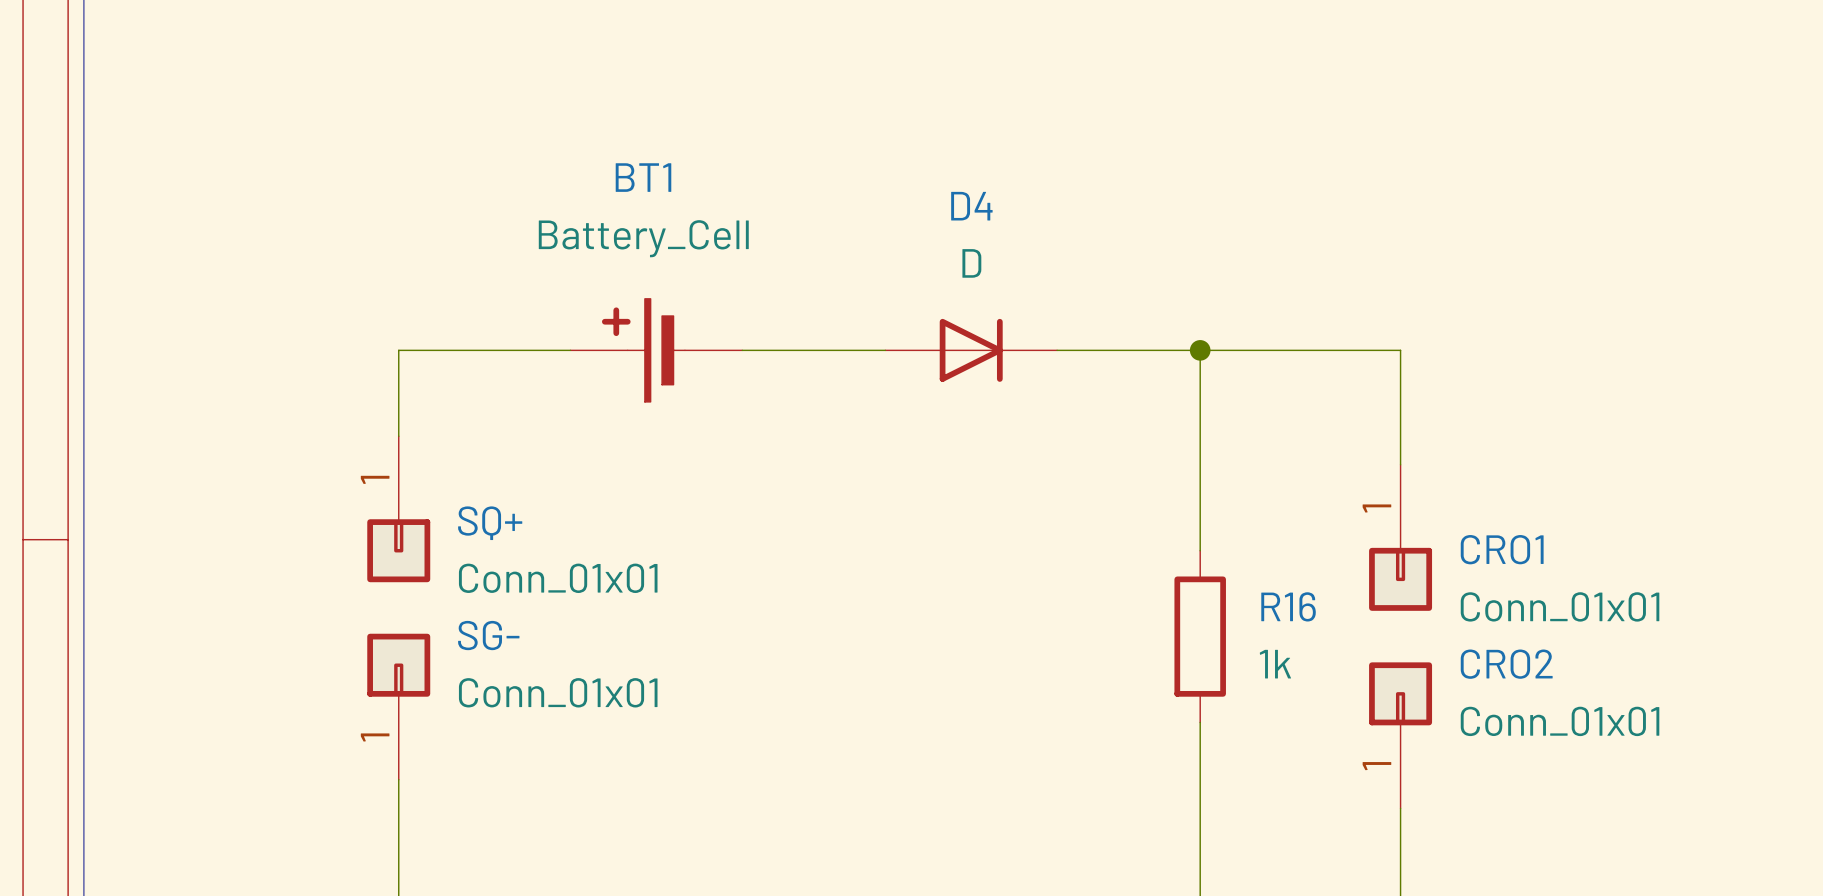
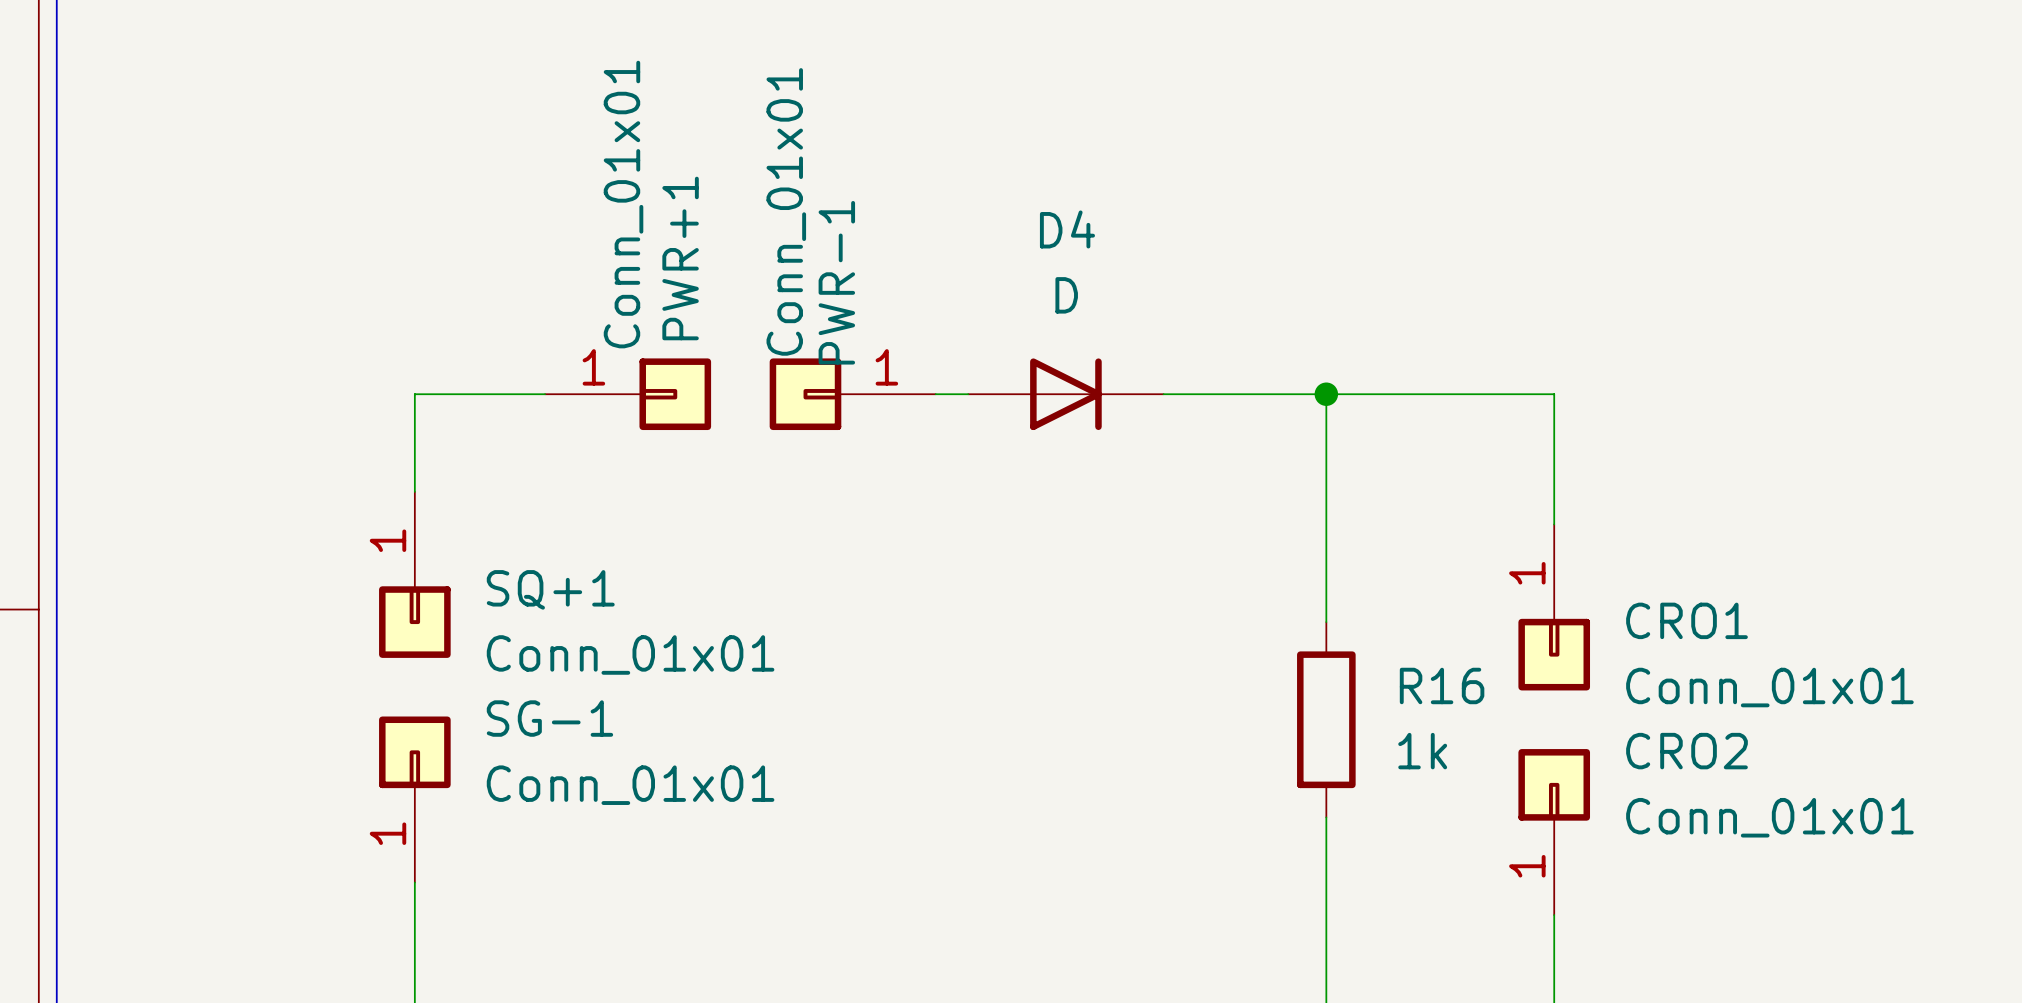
PWR+1: none -> Conn_01x01 (628, 394)
BT1: Battery_Cell (656, 350) -> none
PWR-1: none -> Conn_01x01 (852, 394)
SQ+ name: SQ+ (490, 523) -> SQ+1 (550, 589)
SG- name: SG- (488, 635) -> SG-1 (549, 718)

